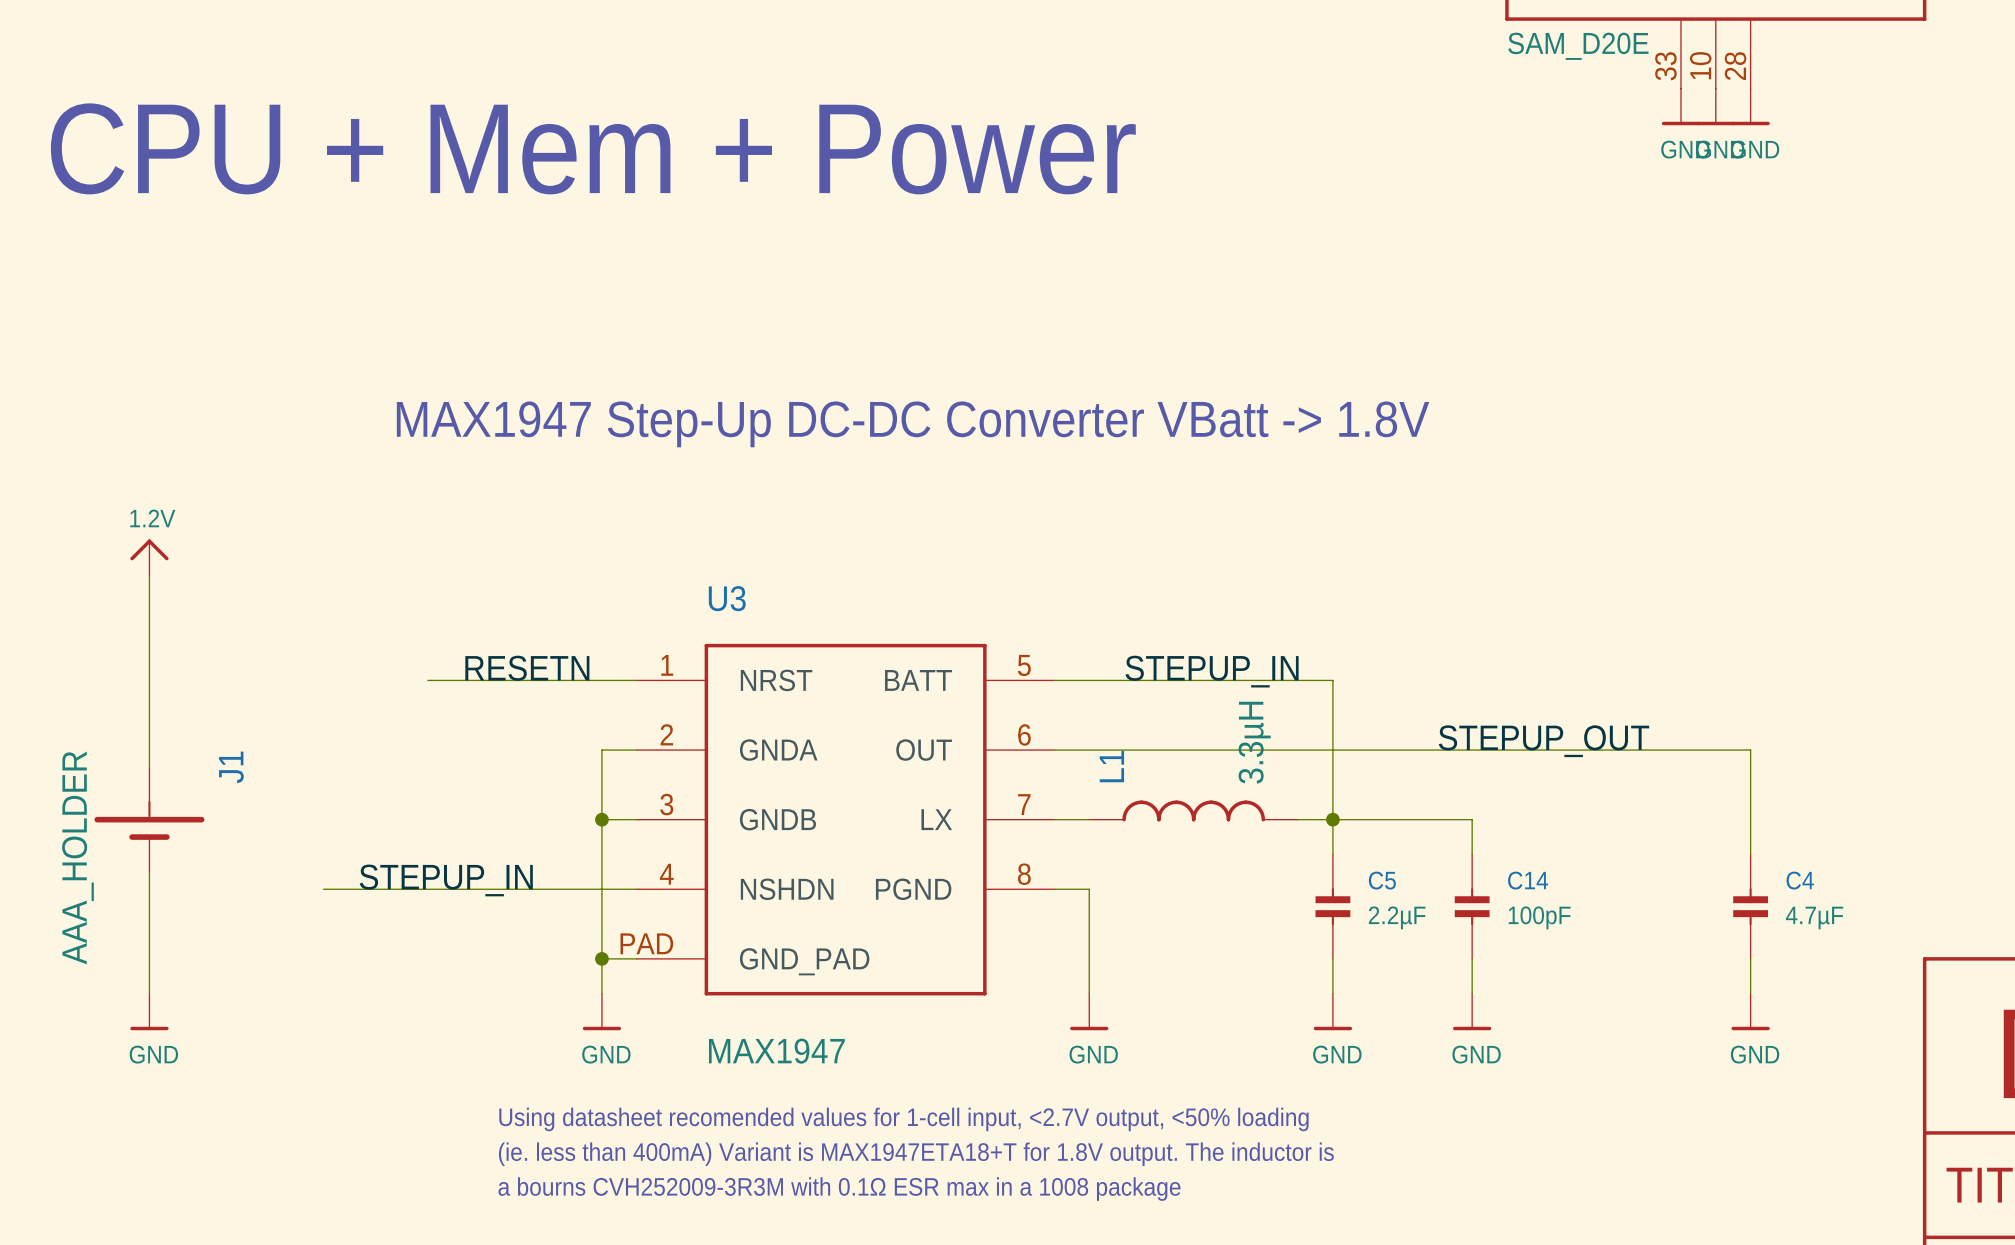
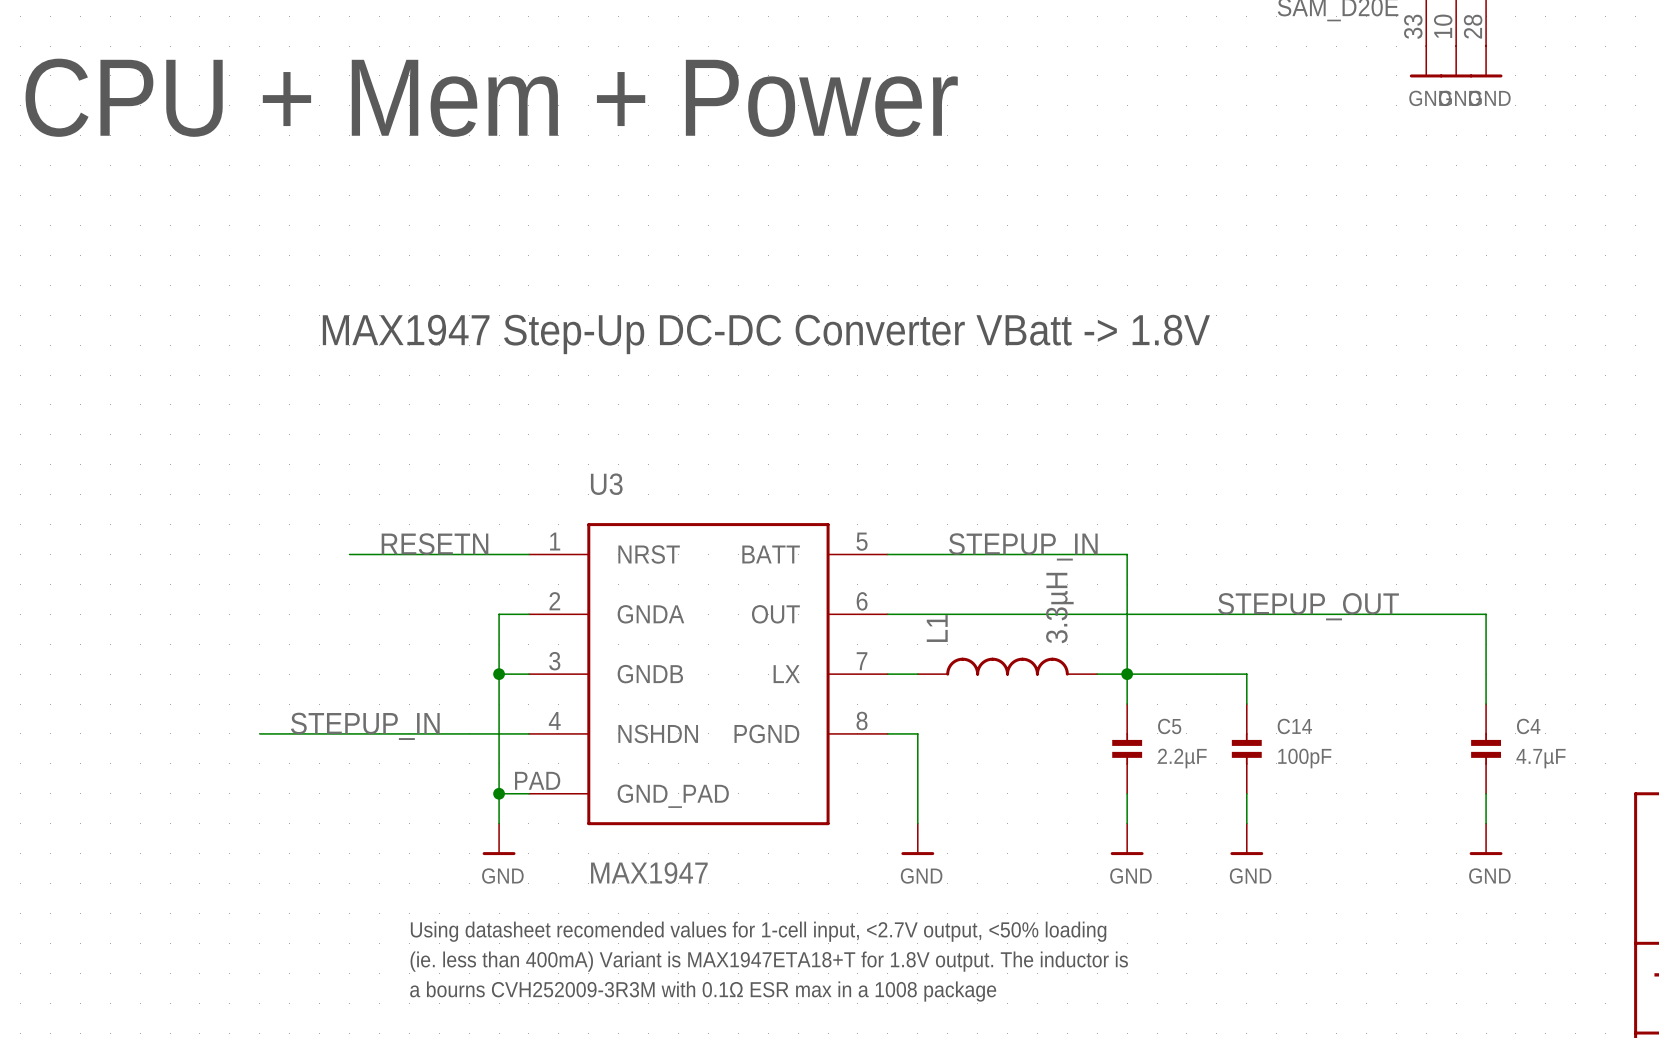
power symbol: 1.2V (149, 557) -> none
wire: (149, 576) (149, 767) -> none
J1: AAA_HOLDER (149, 819) -> none
wire: (149, 871) (149, 993) -> none
power symbol: GND (149, 1011) -> none

